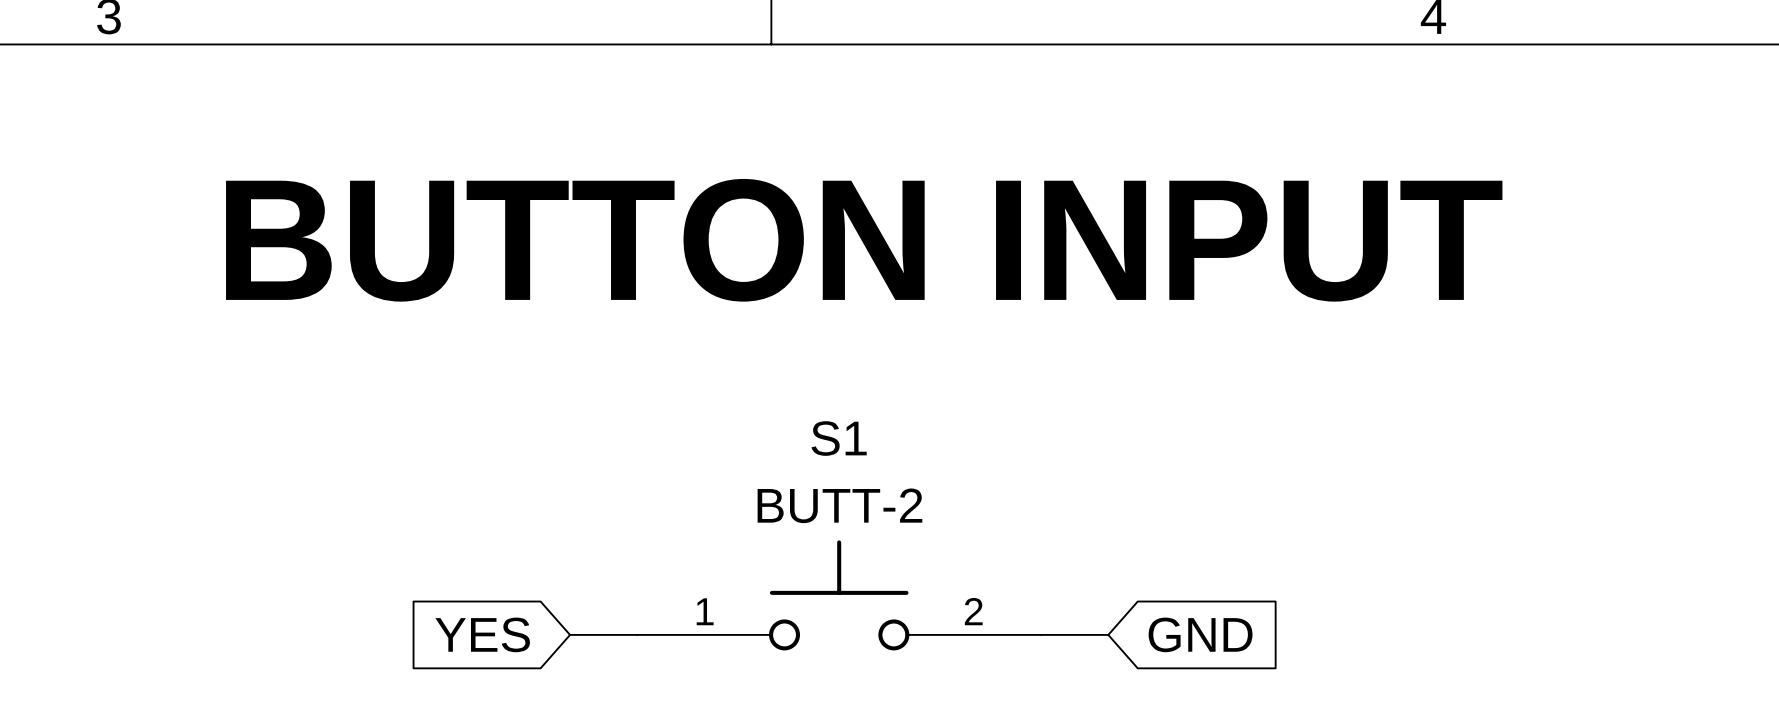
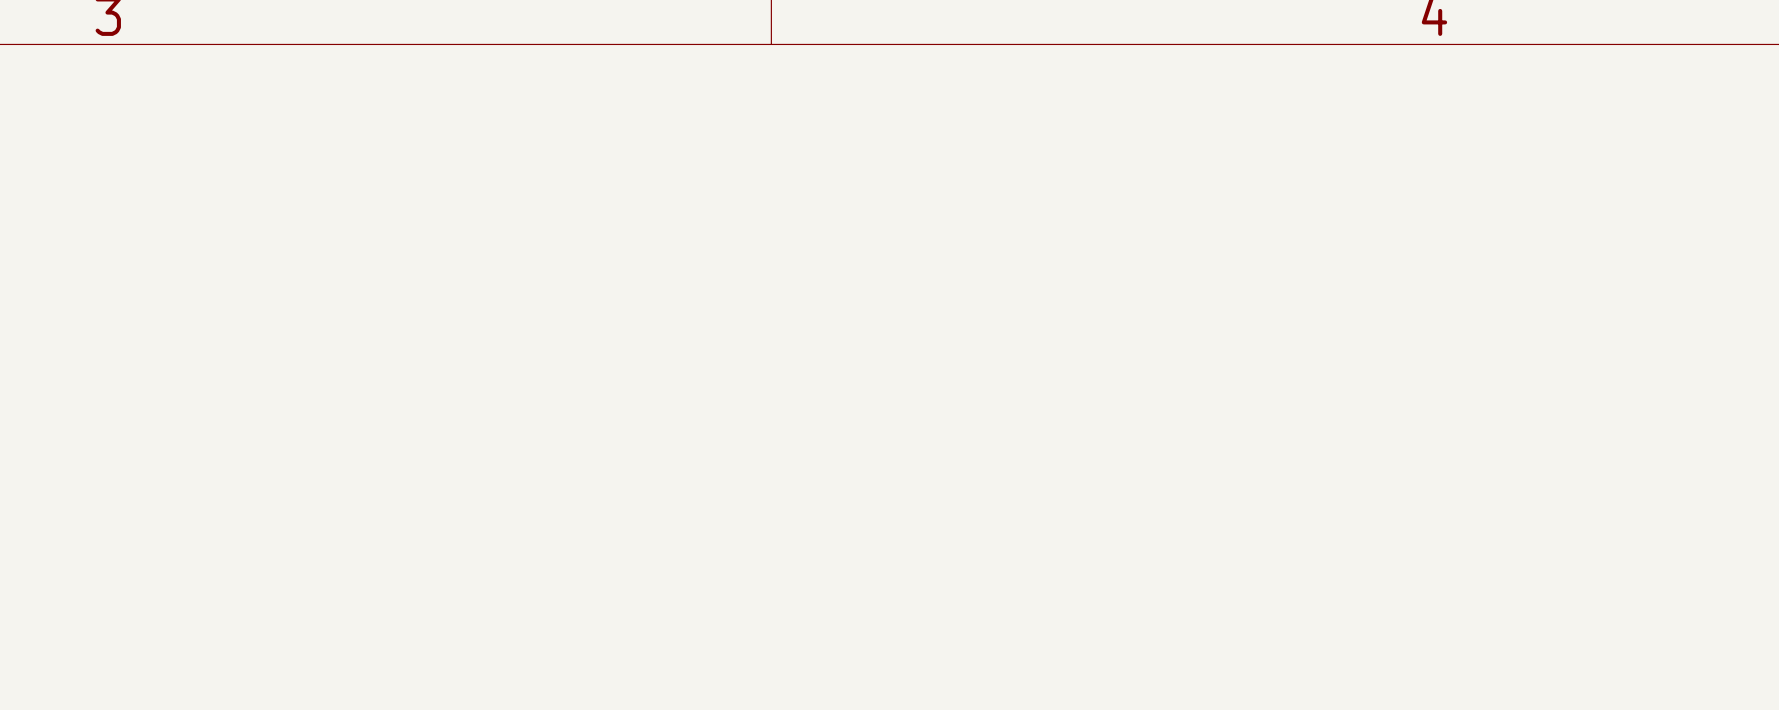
text: BUTTON INPUT (864, 240) -> none
S1: BUTT-2 (839, 595) -> none
global label: YES (482, 634) -> none
wire: (570, 634) (637, 634) -> none
wire: (1041, 634) (1108, 634) -> none
global label: GND (1200, 634) -> none

